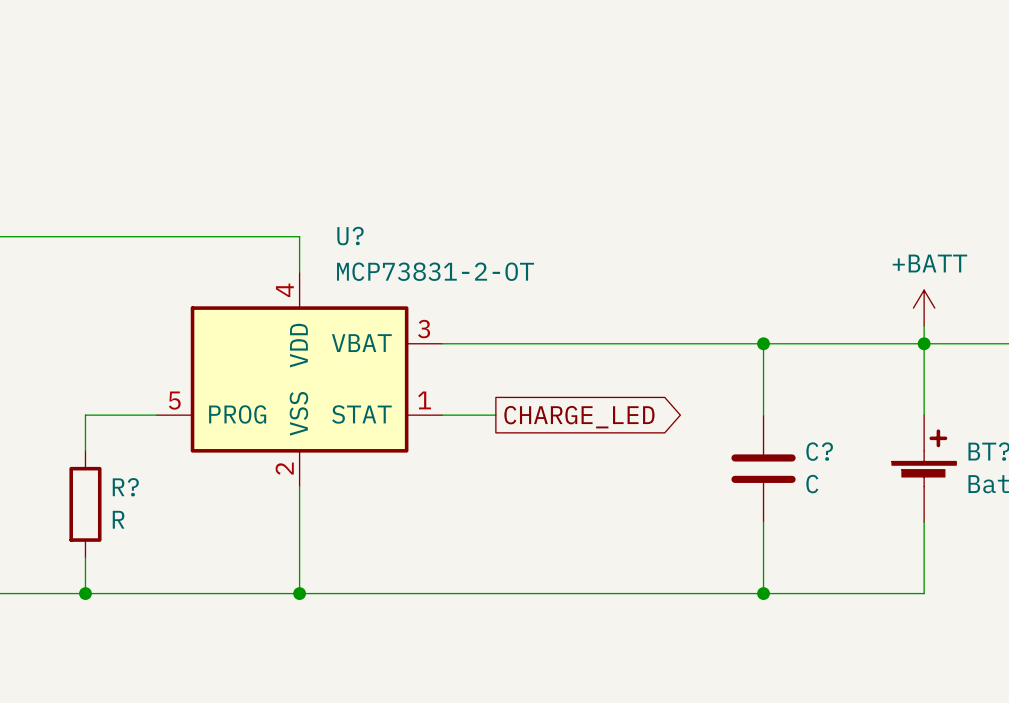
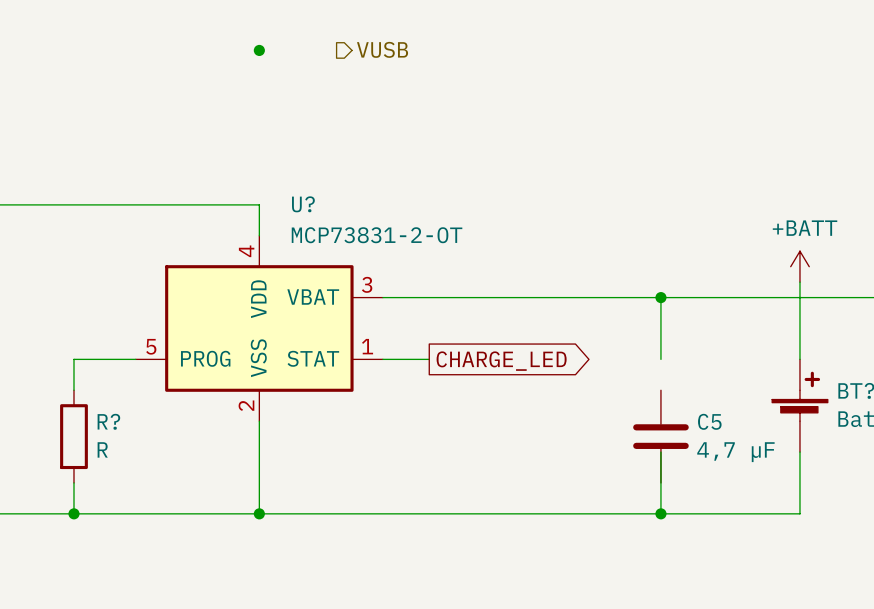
hierarchical label: none -> VUSB (382, 49)
junction: none -> (259, 50)
junction: (924, 343) -> none
C?: C (763, 468) -> none
C5: none -> 4,7 µF (660, 436)

